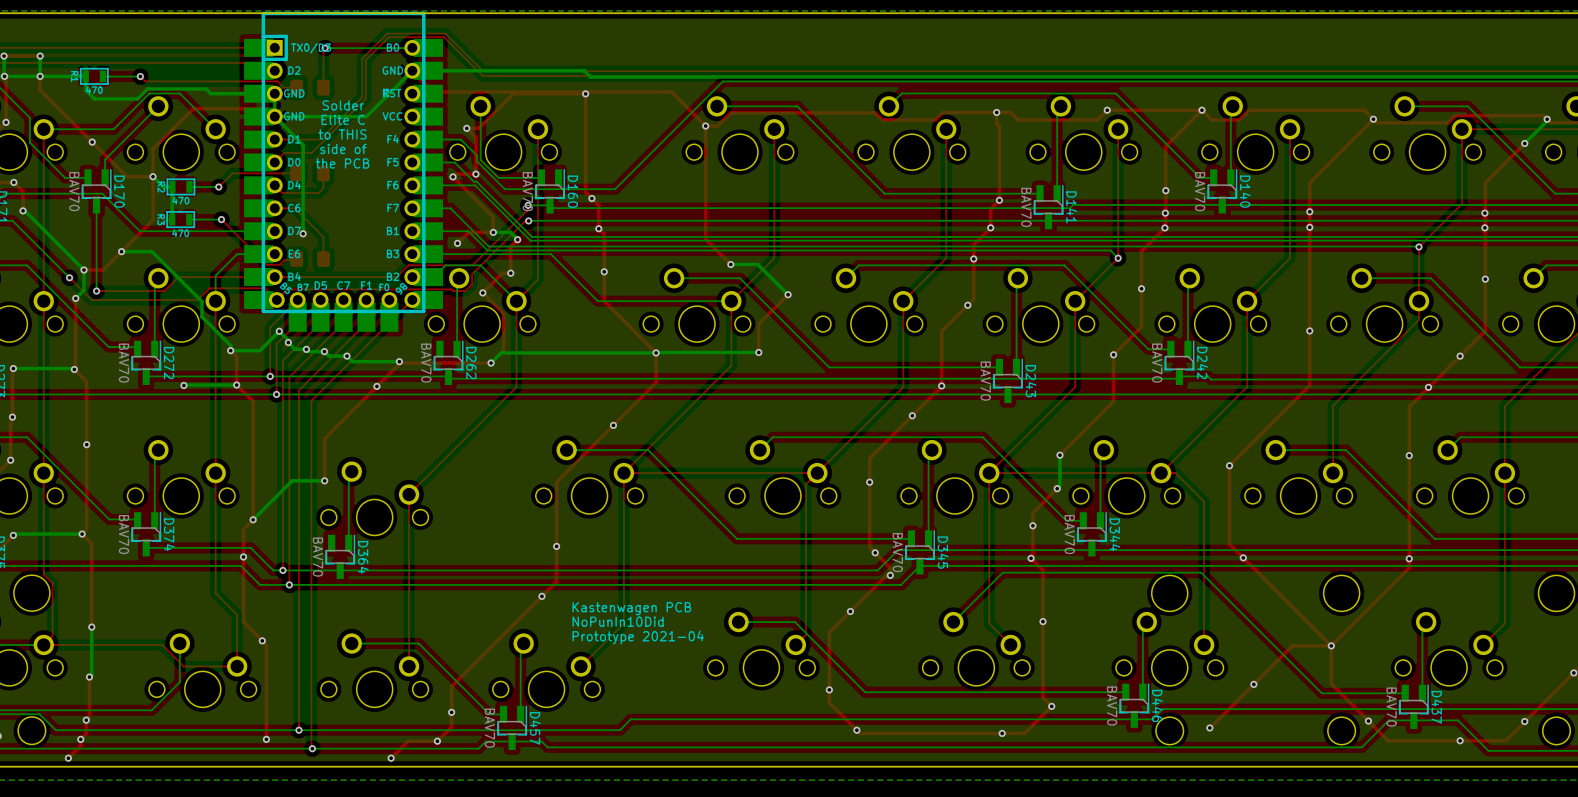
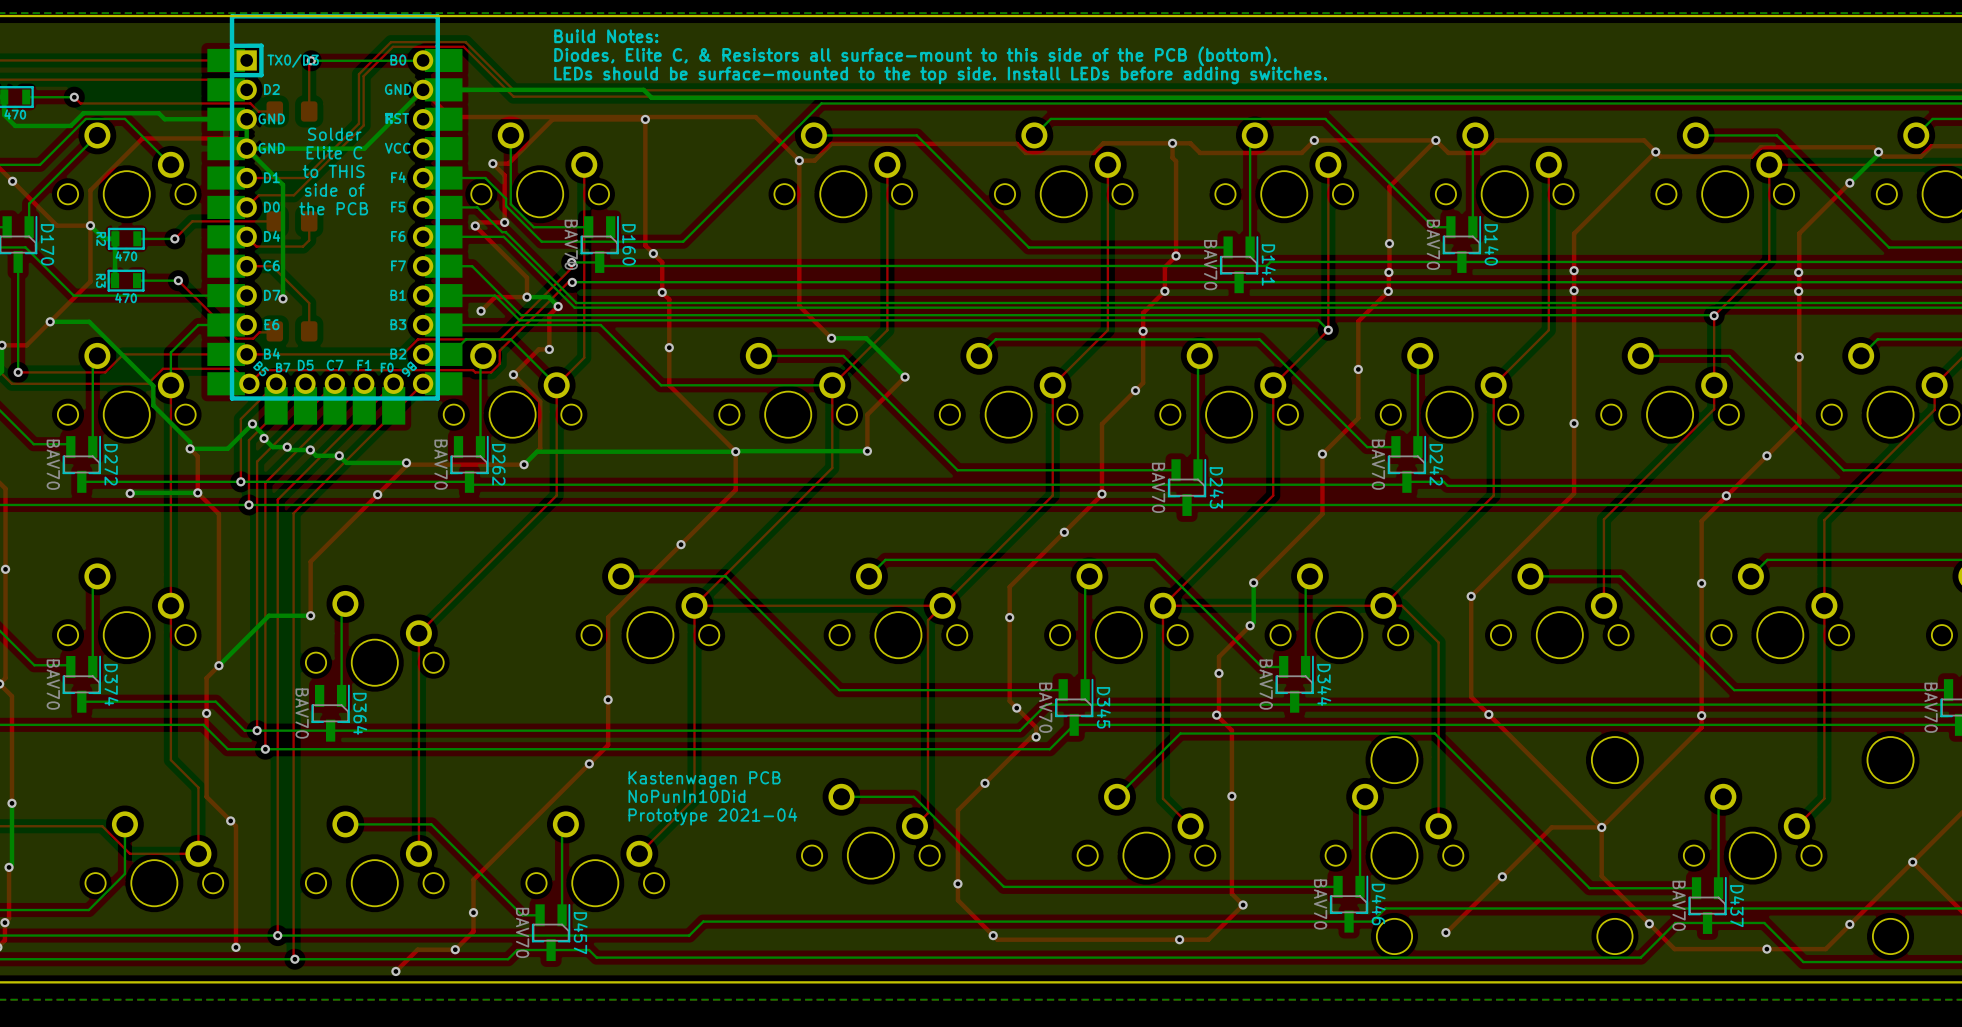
text: none -> Build Notes: (606, 36)
text: none -> Diodes, Elite C, & Resistors all surface-mount to this side of the PCB (bottom). (915, 56)
text: none -> LEDs should be surface-mounted to the top side. Install LEDs before adding switches. (940, 75)

